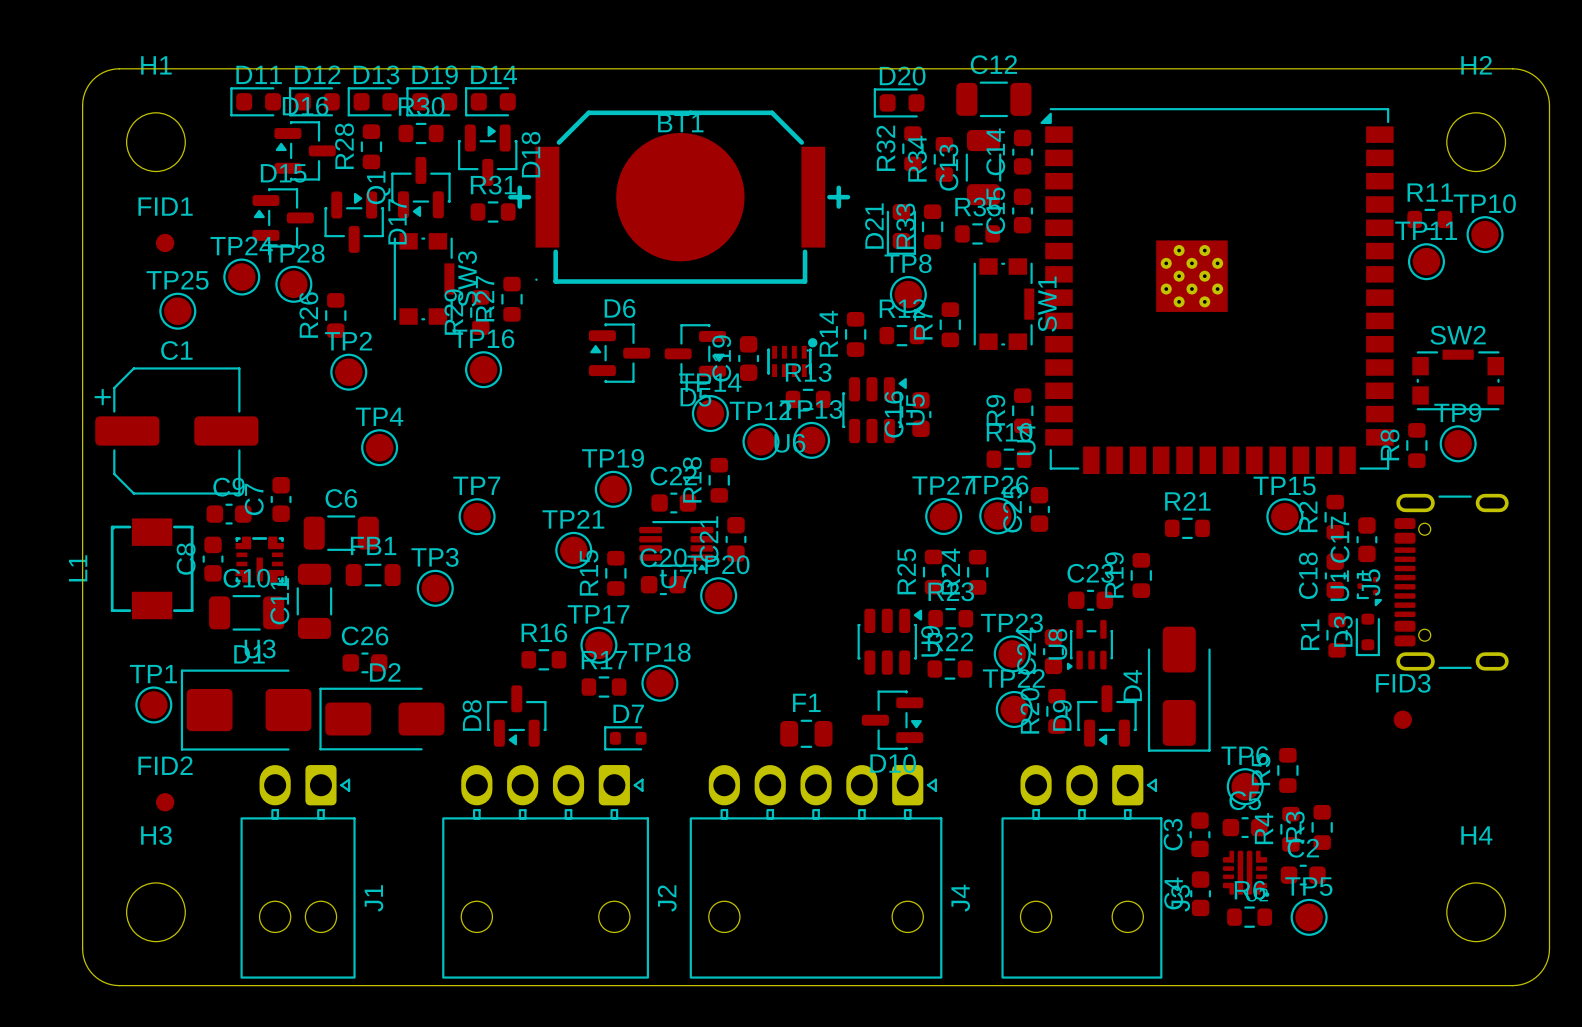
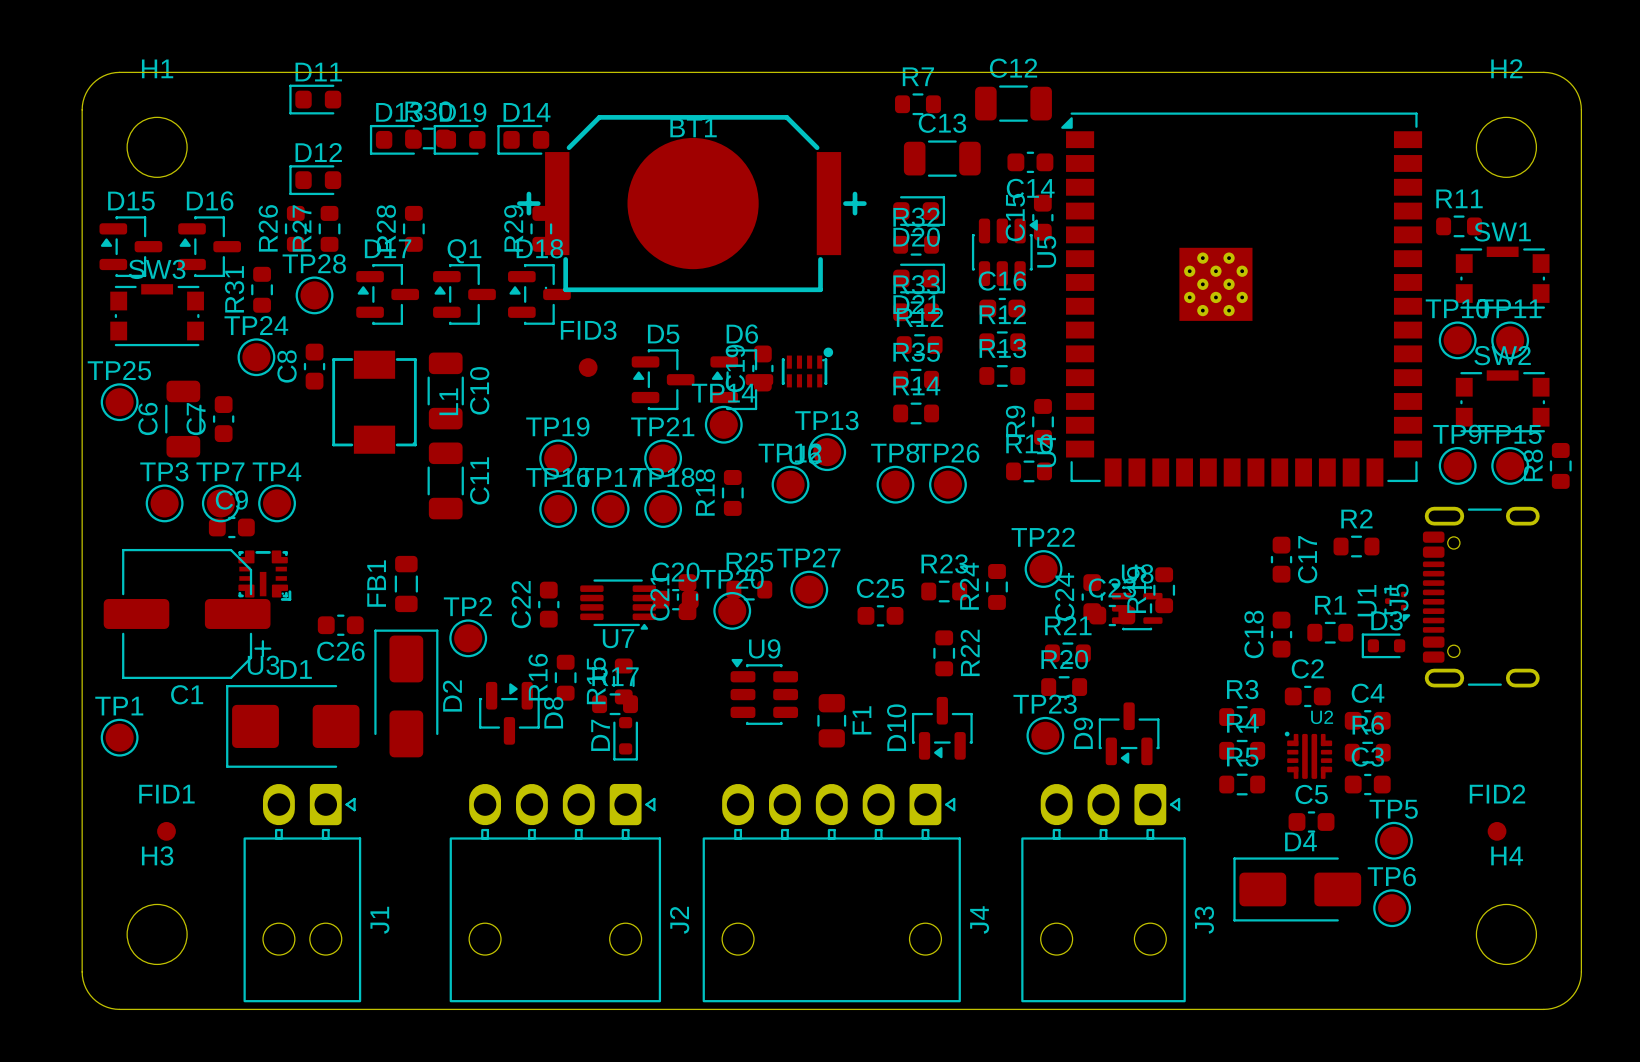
D11 position: (255, 101) -> (315, 99)
D12 position: (314, 101) -> (315, 180)
D13 position: (373, 101) -> (395, 139)
D19 position: (431, 101) -> (459, 139)
D14 position: (490, 101) -> (523, 139)
D20 rotation: 0° (899, 102) -> 180° (919, 211)
D20 position: (899, 102) -> (919, 211)
R28 position: (371, 146) -> (413, 228)
R32 rotation: 0° (912, 148) -> 90° clockwise (916, 244)
R32 position: (912, 148) -> (916, 244)
D16 position: (305, 150) -> (209, 246)
C14 name position: C14 (995, 151) -> C14 (1030, 188)
C14 rotation: 0° (1022, 152) -> 90° clockwise (1030, 162)
D18 rotation: 0° (487, 155) -> 90° counterclockwise (539, 294)
D18 position: (487, 155) -> (539, 294)
R34: (944, 159) -> none
C13 rotation: 0° (983, 167) -> 90° clockwise (942, 158)
C13 position: (983, 167) -> (942, 158)
R31 name position: R31 (493, 185) -> R31 (234, 289)
Q1 rotation: 0° (420, 187) -> 90° clockwise (464, 294)
Q1 position: (420, 187) -> (464, 294)
R31 rotation: 0° (493, 212) -> 90° clockwise (262, 289)
R31 position: (493, 212) -> (262, 289)
D15 position: (283, 217) -> (130, 246)
D17 rotation: 0° (354, 222) -> 90° counterclockwise (387, 294)
D17 position: (354, 222) -> (387, 294)
R33 rotation: 0° (932, 226) -> 90° clockwise (916, 312)
R33 position: (932, 226) -> (916, 312)
D21 rotation: 0° (901, 229) -> 90° counterclockwise (919, 278)
D21 position: (901, 229) -> (919, 278)
R35 position: (977, 233) -> (916, 379)
TP10 position: (1485, 234) -> (1457, 340)
FID1 position: (165, 243) -> (166, 831)
TP11 position: (1426, 261) -> (1510, 340)
TP24 position: (241, 277) -> (256, 357)
SW3 rotation: 0° (424, 278) -> 90° counterclockwise (157, 315)
SW3 position: (424, 278) -> (157, 315)
TP28 position: (293, 284) -> (314, 295)
TP8 position: (908, 294) -> (895, 484)
R27 position: (512, 299) -> (329, 228)
SW1 rotation: 0° (1003, 304) -> 90° counterclockwise (1502, 277)
SW1 position: (1003, 304) -> (1502, 277)
TP25 position: (177, 311) -> (119, 402)
R29 position: (480, 312) -> (541, 228)
R26 position: (335, 315) -> (295, 228)
R7 rotation: 0° (950, 324) -> 90° clockwise (917, 104)
R7 position: (950, 324) -> (917, 104)
R12: none -> (1002, 342)
R14 rotation: 0° (855, 334) -> 90° clockwise (916, 413)
R14 position: (855, 334) -> (916, 413)
D6 position: (619, 353) -> (741, 379)
D5 rotation: 0° (695, 353) -> 180° (663, 379)
D5 position: (695, 353) -> (663, 379)
TP16 position: (483, 369) -> (558, 509)
TP2 position: (348, 372) -> (468, 638)
SW2 position: (1458, 379) -> (1502, 401)
R13 position: (808, 399) -> (1002, 375)
U5 position: (874, 410) -> (1004, 252)
C16 rotation: 0° (920, 414) -> 90° clockwise (1002, 308)
C16 position: (920, 414) -> (1002, 308)
C1 rotation: 0° (176, 430) -> 180° (187, 613)
C1 position: (176, 430) -> (187, 613)
TP12 position: (760, 441) -> (790, 484)
TP9 position: (1458, 443) -> (1457, 465)
R8 position: (1416, 445) -> (1560, 465)
TP4 position: (379, 447) -> (277, 503)
C22 name position: C22 (673, 476) -> C22 (521, 604)
TP19 position: (613, 489) -> (558, 458)
C6 name position: C6 (341, 498) -> C6 (147, 418)
C7 position: (281, 499) -> (223, 419)
C22 rotation: 0° (673, 503) -> 90° clockwise (548, 604)
C22 position: (673, 503) -> (548, 604)
C25 rotation: 0° (1039, 509) -> 90° clockwise (880, 615)
C25 position: (1039, 509) -> (880, 615)
TP26 position: (997, 515) -> (947, 484)
TP7 position: (477, 516) -> (220, 503)
TP27 position: (943, 516) -> (809, 589)
TP15 position: (1284, 516) -> (1510, 465)
R2 rotation: 0° (1335, 517) -> 90° clockwise (1356, 546)
R21 position: (1187, 528) -> (1067, 653)
C6 rotation: 0° (341, 533) -> 90° clockwise (183, 419)
C6 position: (341, 533) -> (183, 419)
C21 position: (735, 539) -> (687, 597)
C17 name position: C17 (1340, 539) -> C17 (1307, 559)
C17 position: (1366, 539) -> (1281, 559)
FB1 name position: FB1 (373, 545) -> FB1 (376, 583)
U7 position: (676, 545) -> (618, 604)
TP21 position: (573, 550) -> (663, 458)
C8 position: (213, 559) -> (314, 366)
L1 rotation: 0° (152, 568) -> 180° (374, 402)
L1 position: (152, 568) -> (374, 402)
R25 rotation: 0° (933, 572) -> 90° clockwise (749, 589)
R25 position: (933, 572) -> (749, 589)
R15 position: (615, 573) -> (623, 681)
FB1 rotation: 0° (373, 575) -> 90° clockwise (406, 584)
C18 position: (1335, 575) -> (1281, 634)
TP3 position: (435, 588) -> (164, 503)
C11 name position: C11 (279, 601) -> C11 (479, 480)
C11 position: (314, 601) -> (445, 480)
C10 rotation: 0° (246, 612) -> 90° clockwise (445, 390)
C10 position: (246, 612) -> (445, 390)
R23 position: (950, 618) -> (944, 591)
R16 name position: R16 (544, 632) -> R16 (538, 677)
D3 rotation: 0° (1367, 634) -> 90° clockwise (1383, 645)
C26 name position: C26 (365, 635) -> C26 (340, 651)
R1 rotation: 0° (1337, 635) -> 90° clockwise (1330, 632)
R1 position: (1337, 635) -> (1330, 632)
U9 rotation: 0° (889, 641) -> 90° counterclockwise (764, 691)
U9 position: (889, 641) -> (764, 691)
U8 rotation: 0° (1089, 644) -> 90° clockwise (1136, 606)
U8 position: (1089, 644) -> (1136, 606)
TP17 position: (598, 645) -> (610, 509)
C24 position: (1053, 651) -> (1092, 597)
TP23 position: (1012, 653) -> (1045, 735)
R16 rotation: 0° (543, 659) -> 90° clockwise (565, 677)
C26 position: (364, 662) -> (340, 625)
R22 rotation: 0° (949, 669) -> 90° clockwise (944, 653)
R22 position: (949, 669) -> (944, 653)
TP18 position: (659, 683) -> (663, 509)
D4 rotation: 0° (1179, 689) -> 90° clockwise (1297, 889)
D4 position: (1179, 689) -> (1297, 889)
TP1 position: (153, 704) -> (119, 737)
TP22 position: (1014, 709) -> (1043, 569)
D1 position: (246, 710) -> (292, 726)
R20 rotation: 0° (1056, 711) -> 90° clockwise (1064, 687)
R20 position: (1056, 711) -> (1064, 687)
D8 rotation: 0° (516, 716) -> 180° (509, 713)
D2 rotation: 0° (381, 719) -> 90° clockwise (406, 693)
FID3 position: (1402, 719) -> (588, 367)
D10 rotation: 0° (892, 720) -> 90° clockwise (942, 728)
F1 rotation: 0° (806, 733) -> 90° clockwise (831, 720)
F1 position: (806, 733) -> (831, 720)
D7 rotation: 0° (625, 738) -> 90° counterclockwise (625, 738)
R5 rotation: 0° (1287, 770) -> 90° clockwise (1242, 784)
R5 position: (1287, 770) -> (1242, 784)
TP6 position: (1245, 786) -> (1392, 908)
FID2 position: (165, 802) -> (1497, 831)
C5 position: (1245, 827) -> (1311, 822)
R3 rotation: 0° (1322, 827) -> 90° clockwise (1242, 717)
R3 position: (1322, 827) -> (1242, 717)
R4 rotation: 0° (1290, 829) -> 90° clockwise (1242, 750)
R4 position: (1290, 829) -> (1242, 750)
C3 rotation: 0° (1200, 834) -> 90° clockwise (1367, 784)
C3 position: (1200, 834) -> (1367, 784)
U2 rotation: 0° (1246, 873) -> 180° (1308, 755)
U2 position: (1246, 873) -> (1308, 755)
C2 position: (1303, 875) -> (1307, 696)
C4 rotation: 0° (1200, 893) -> 90° clockwise (1367, 720)
C4 position: (1200, 893) -> (1367, 720)
R6 position: (1249, 917) -> (1367, 752)
TP5 position: (1309, 917) -> (1393, 840)

